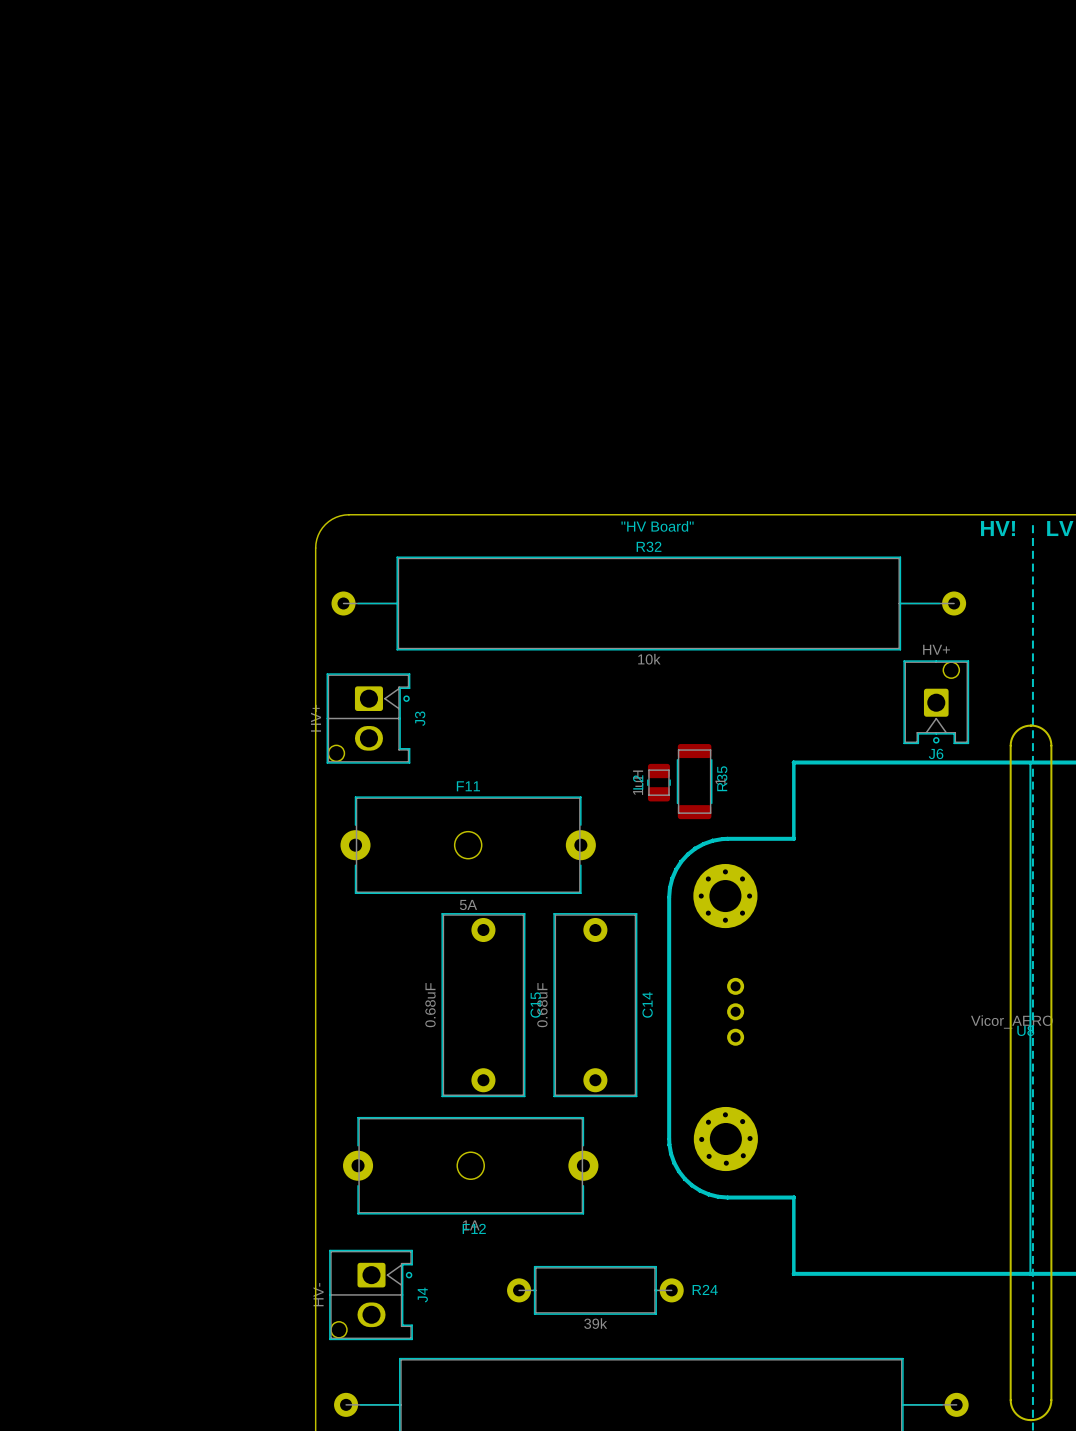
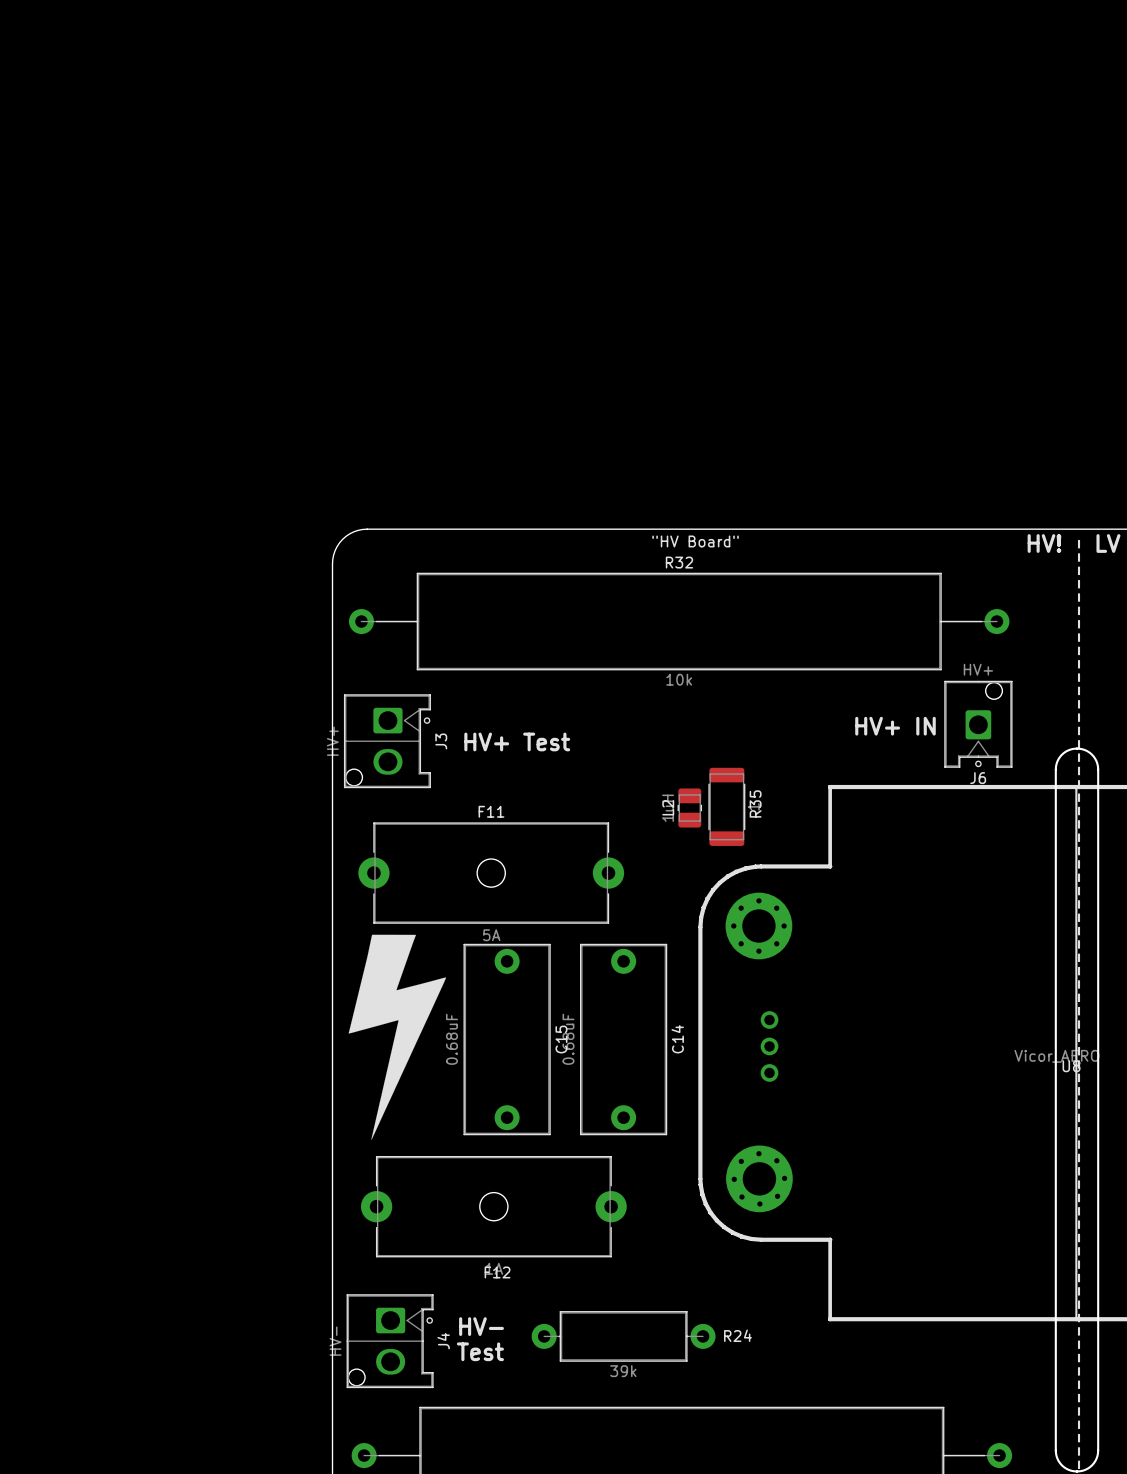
text: none -> HV+ IN (895, 726)
text: none -> HV+ Test (517, 741)
drawing: none -> [348, 934, 447, 1140]
text: none -> HV- (481, 1326)
text: none -> Test (480, 1351)

